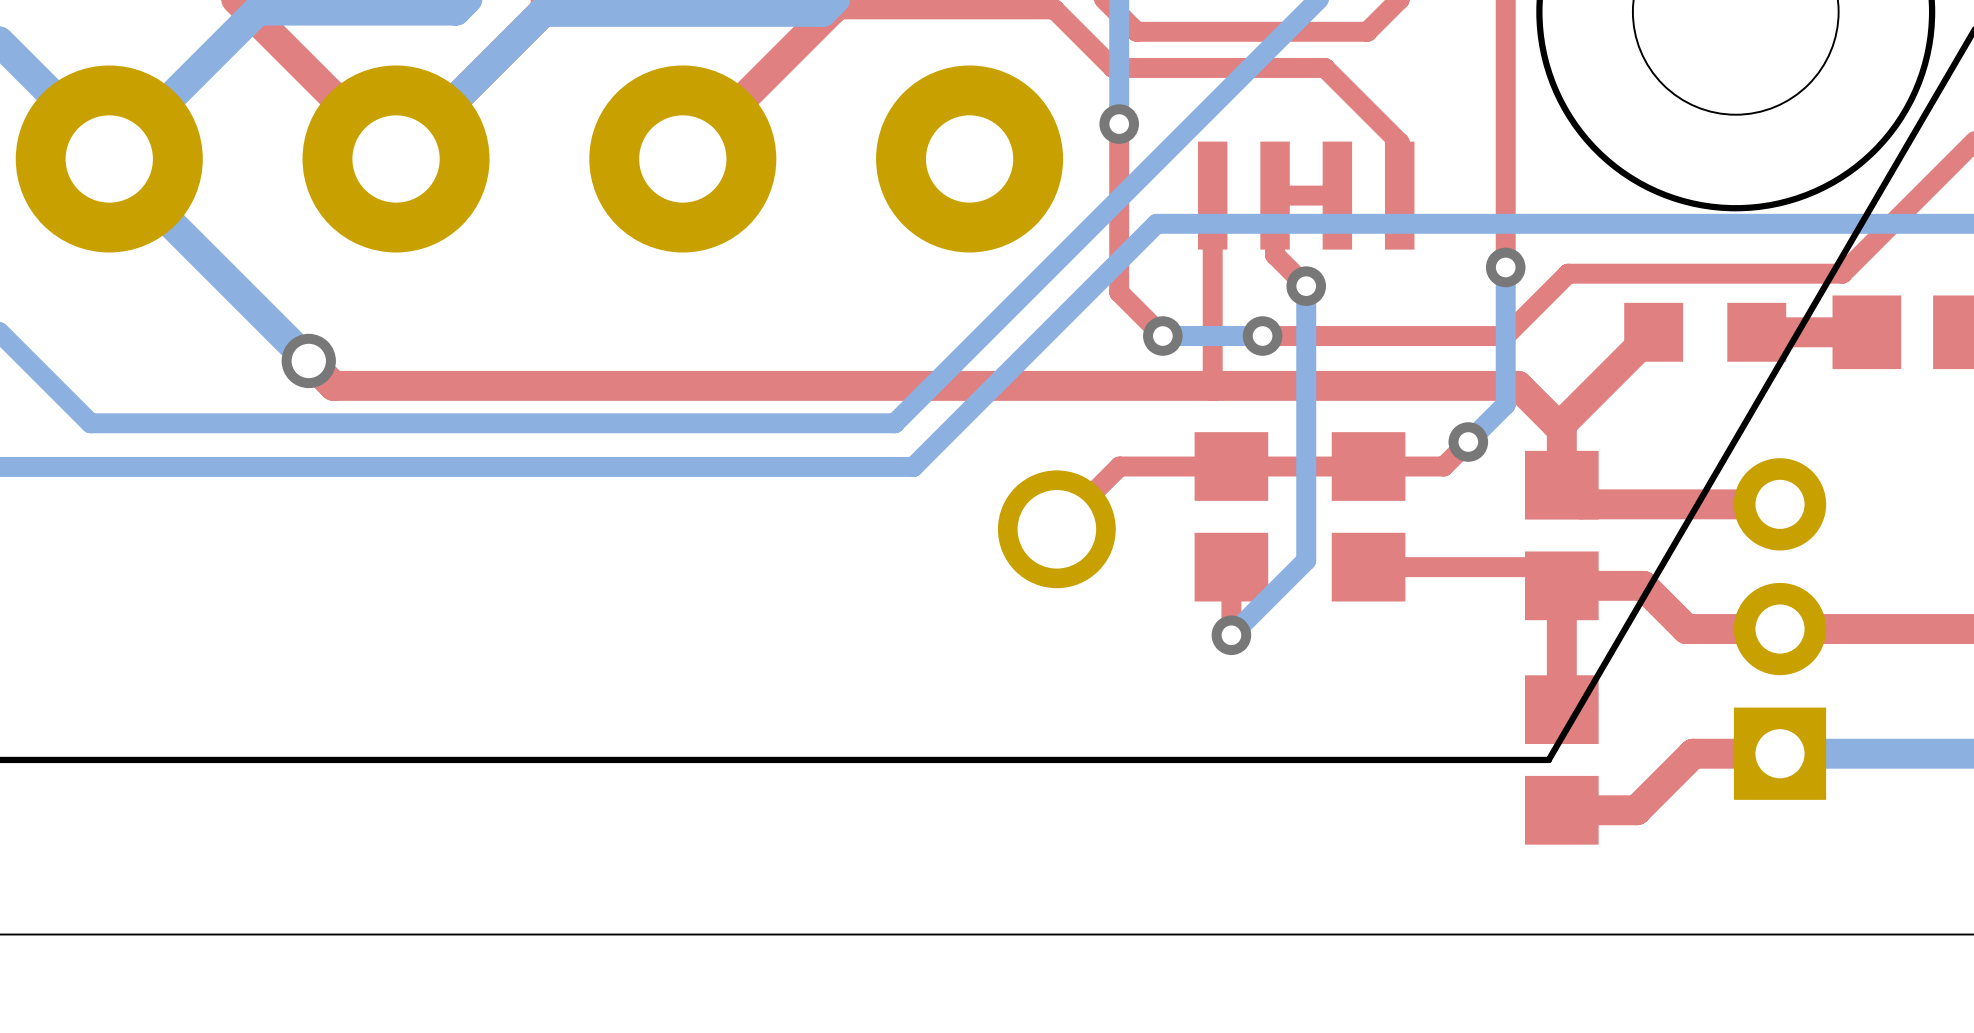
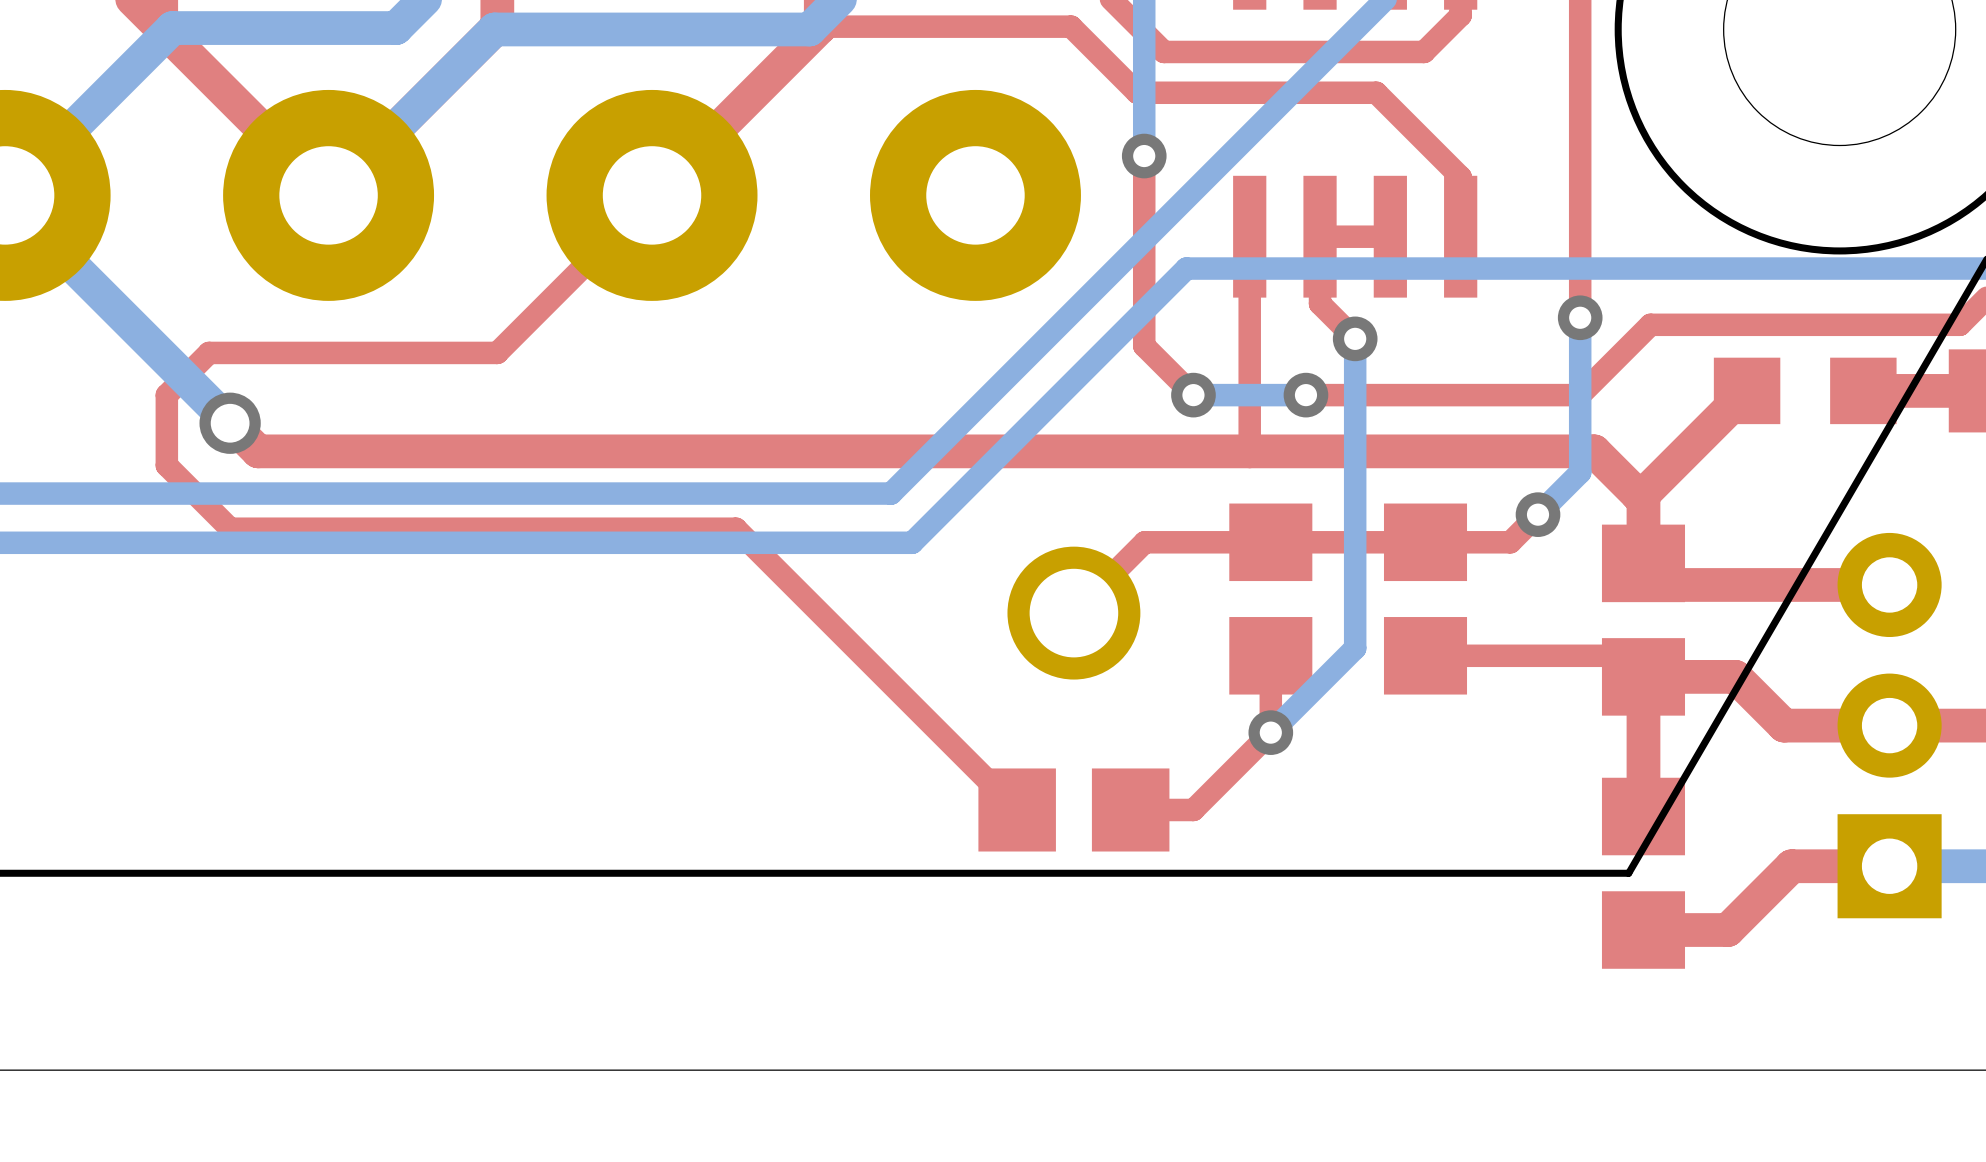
top track: none -> (654, 195) (497, 352) (209, 352) (166, 395) (166, 465) (230, 528) (735, 528) (1017, 809)
top track: none -> (1270, 732) (1193, 809) (1130, 809)
part: none -> (1073, 809)

